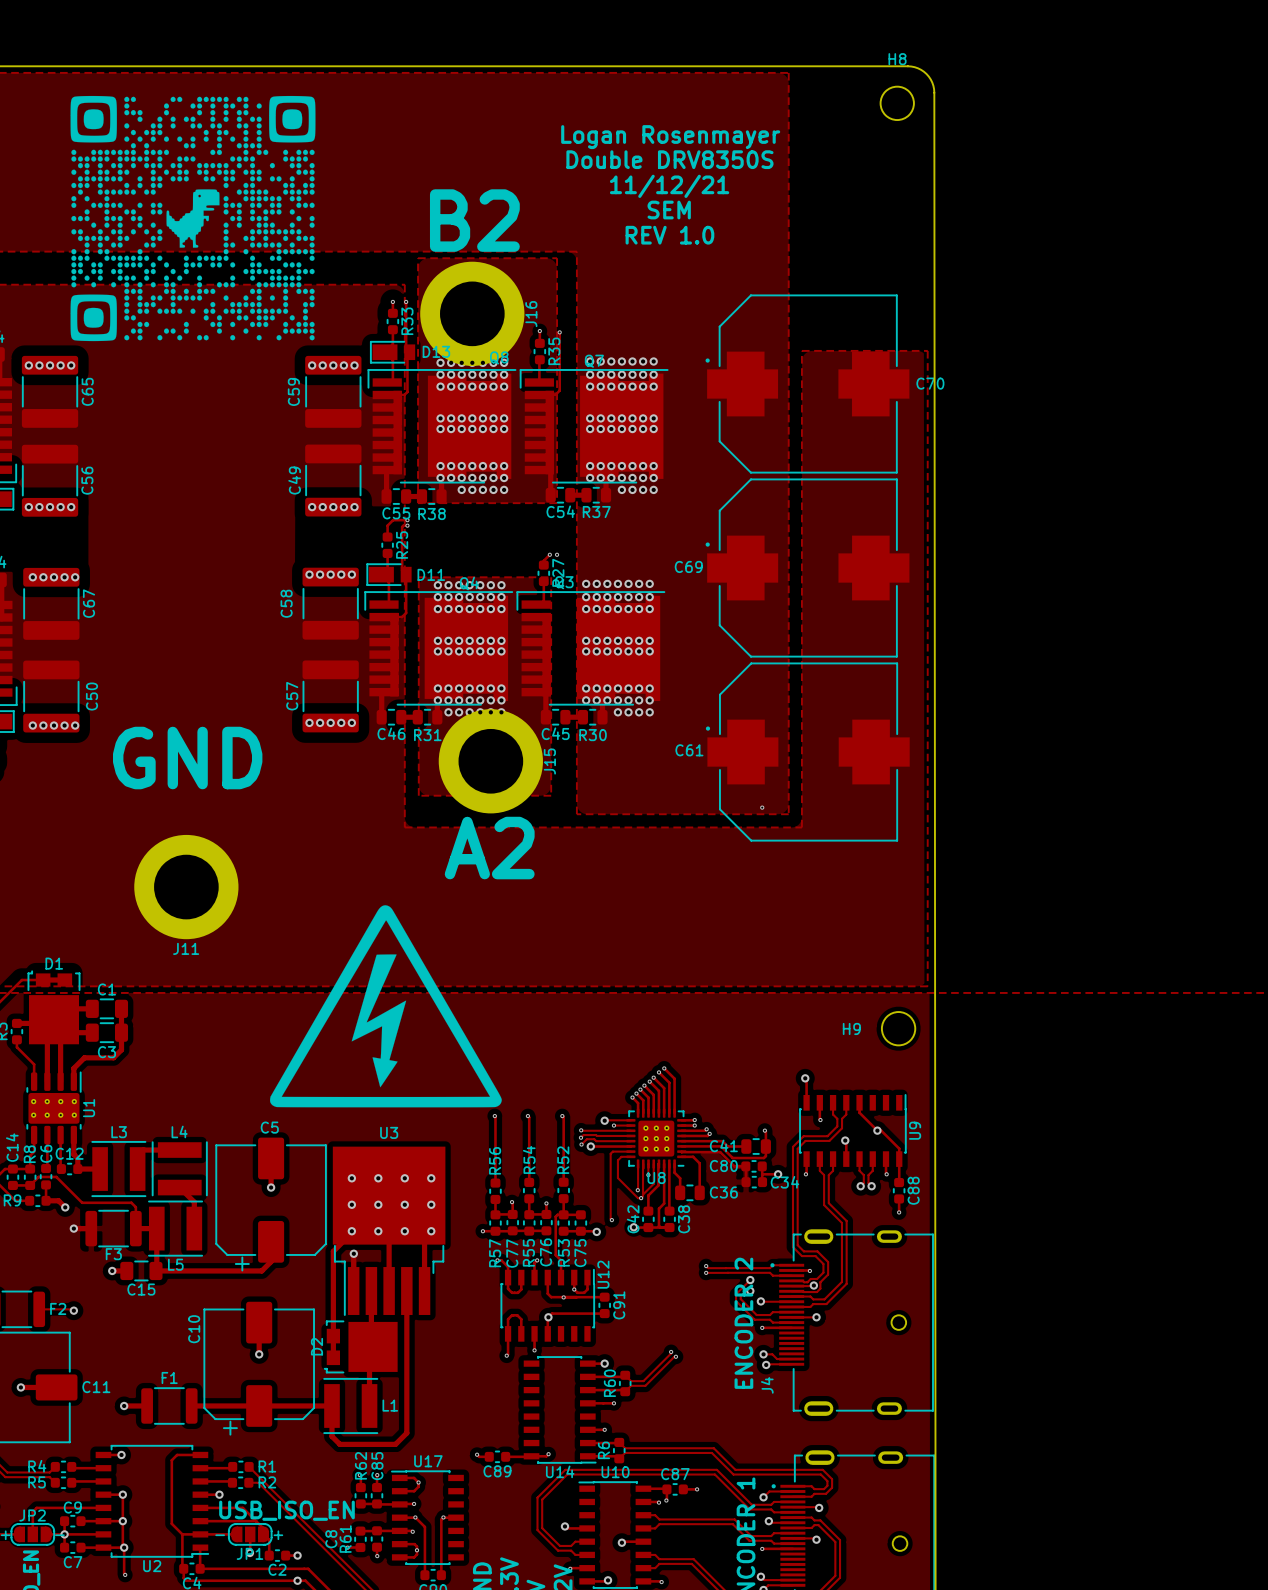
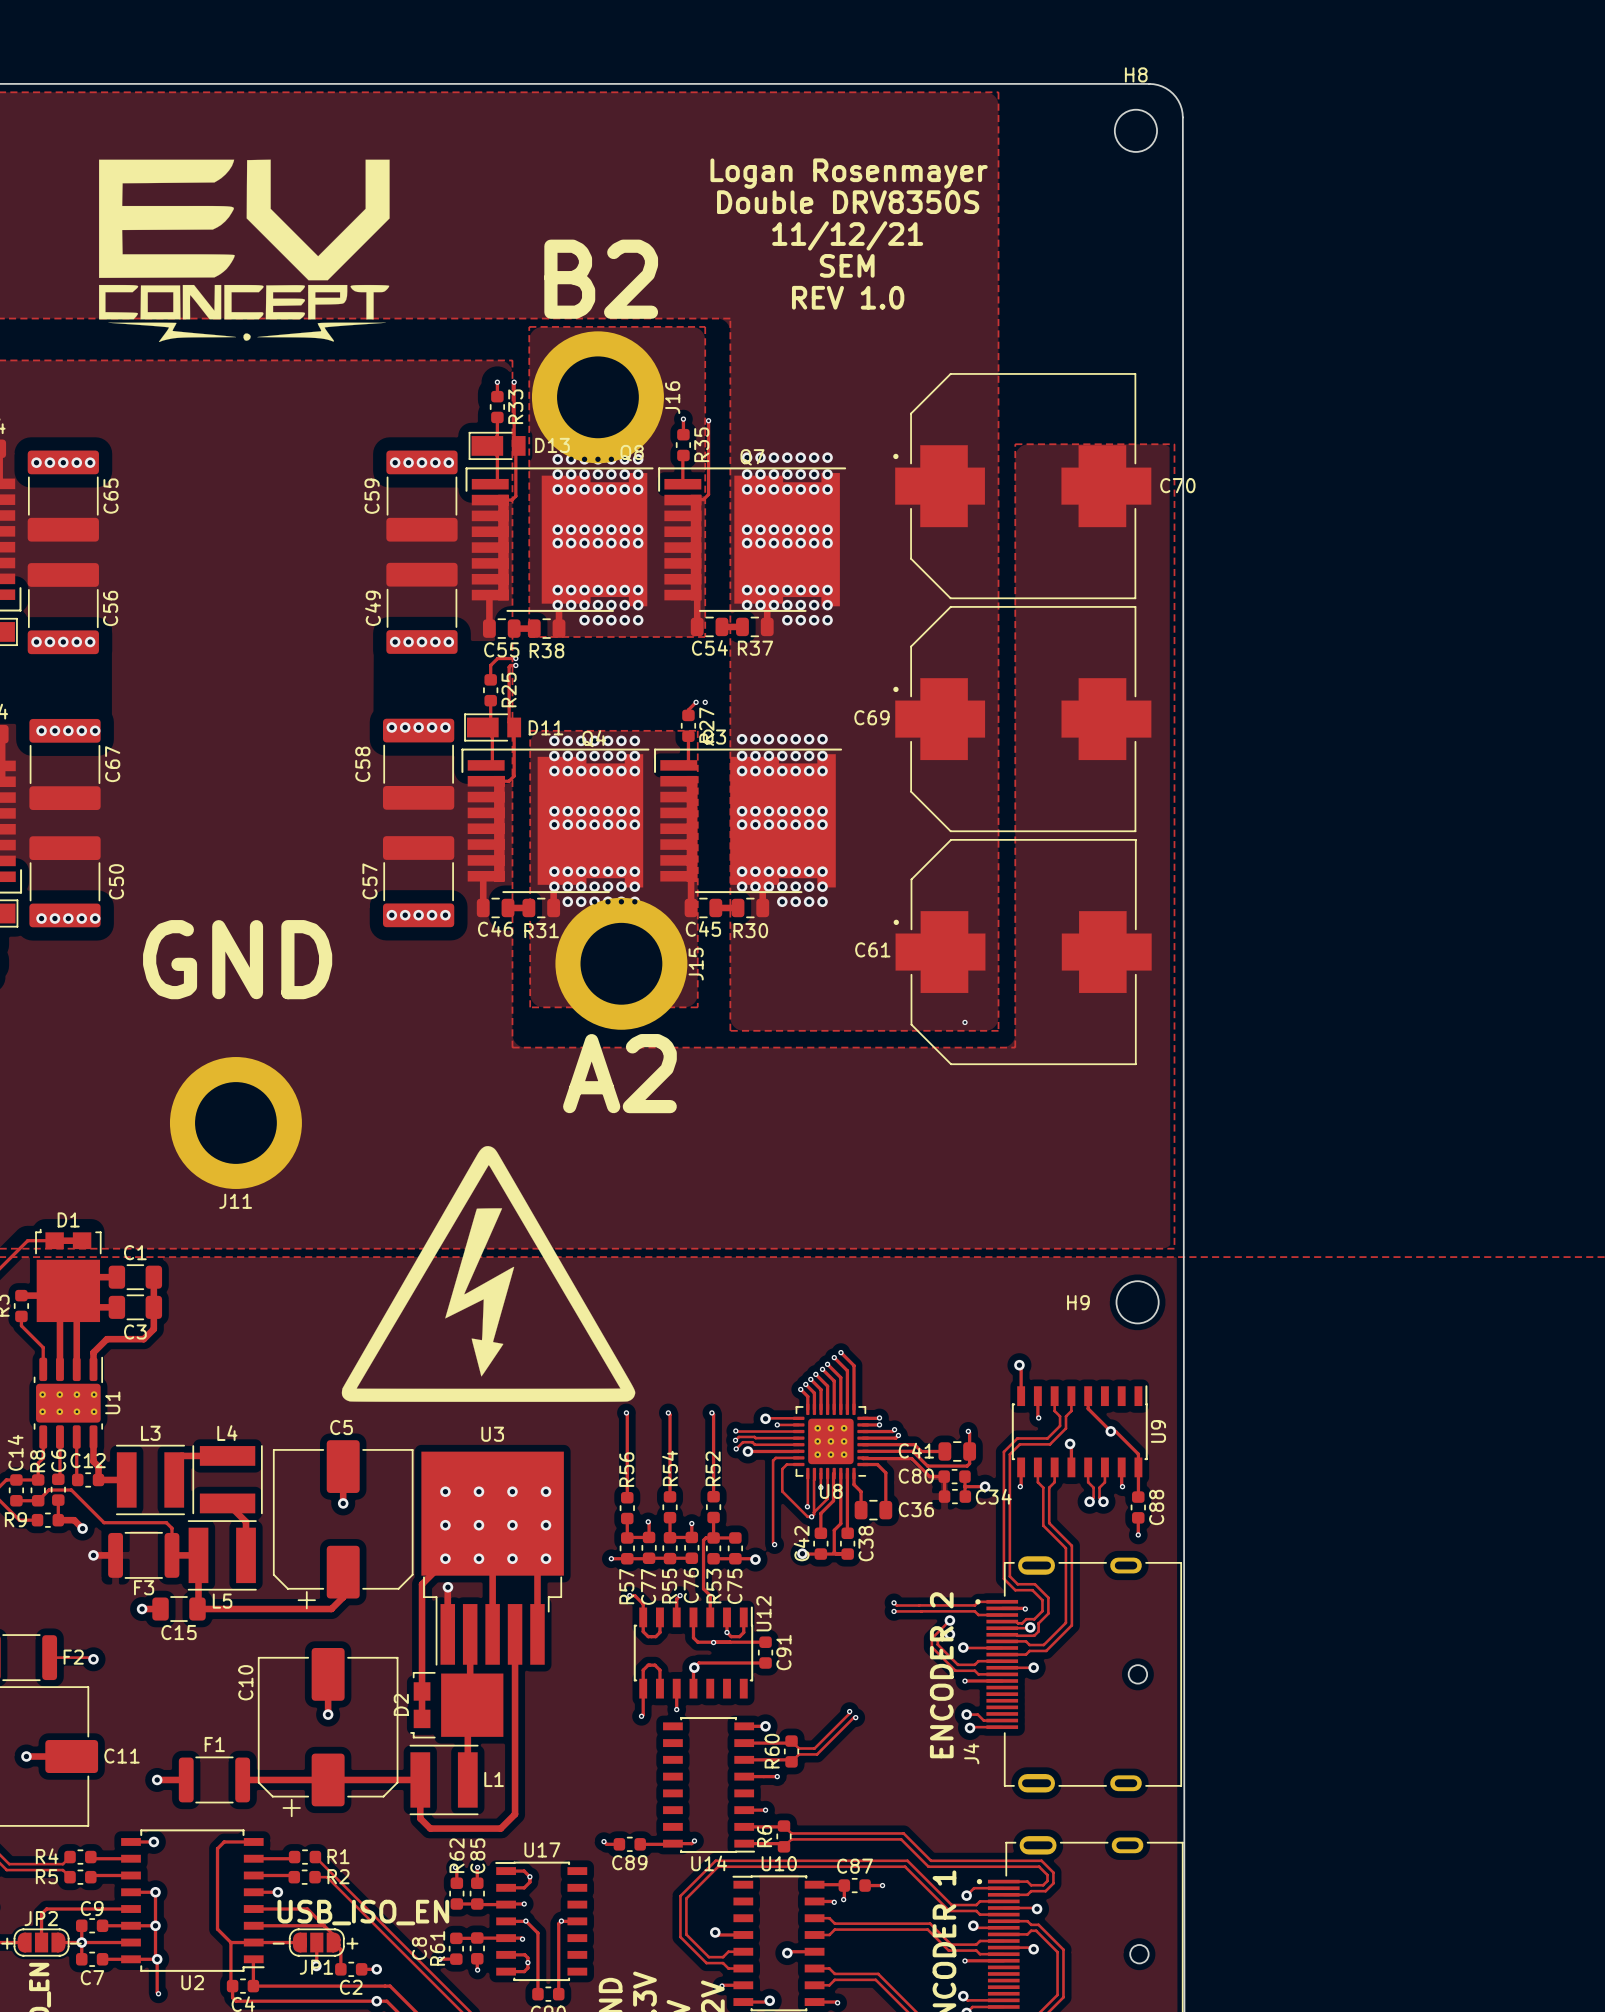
drawing: [70, 95, 316, 342] -> none
drawing: none -> [99, 159, 390, 343]

